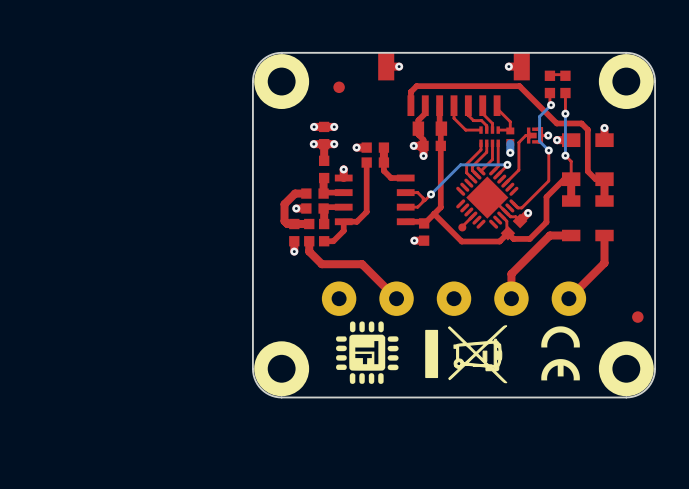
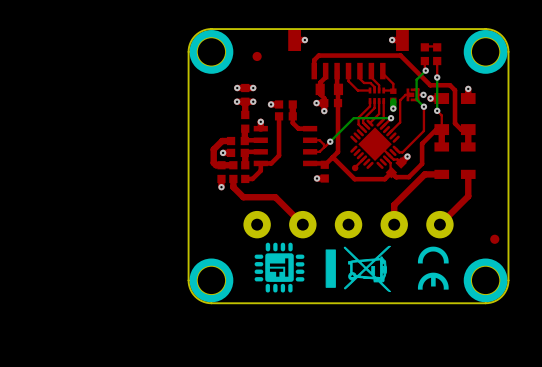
part footprint: [254, 54, 310, 110] -> [189, 30, 234, 74]
part footprint: [598, 54, 654, 110] -> [463, 30, 508, 74]
part footprint: [254, 341, 310, 397] -> [189, 258, 234, 303]
part footprint: [598, 341, 654, 397] -> [463, 258, 508, 303]

